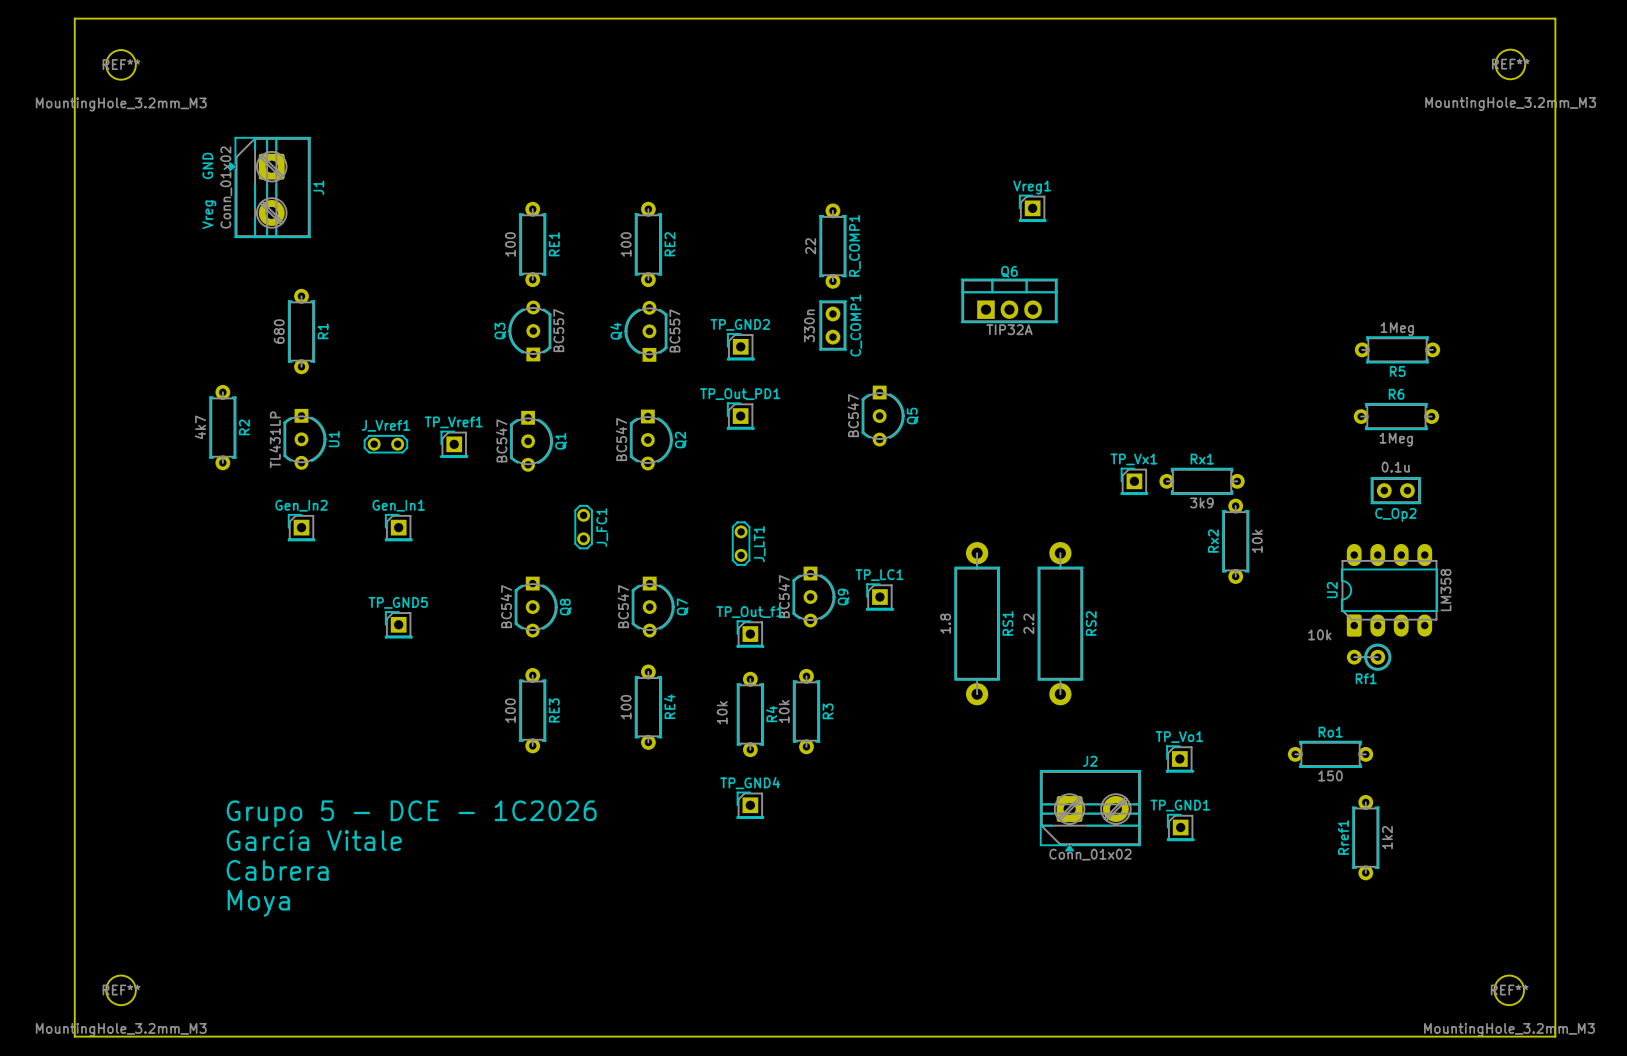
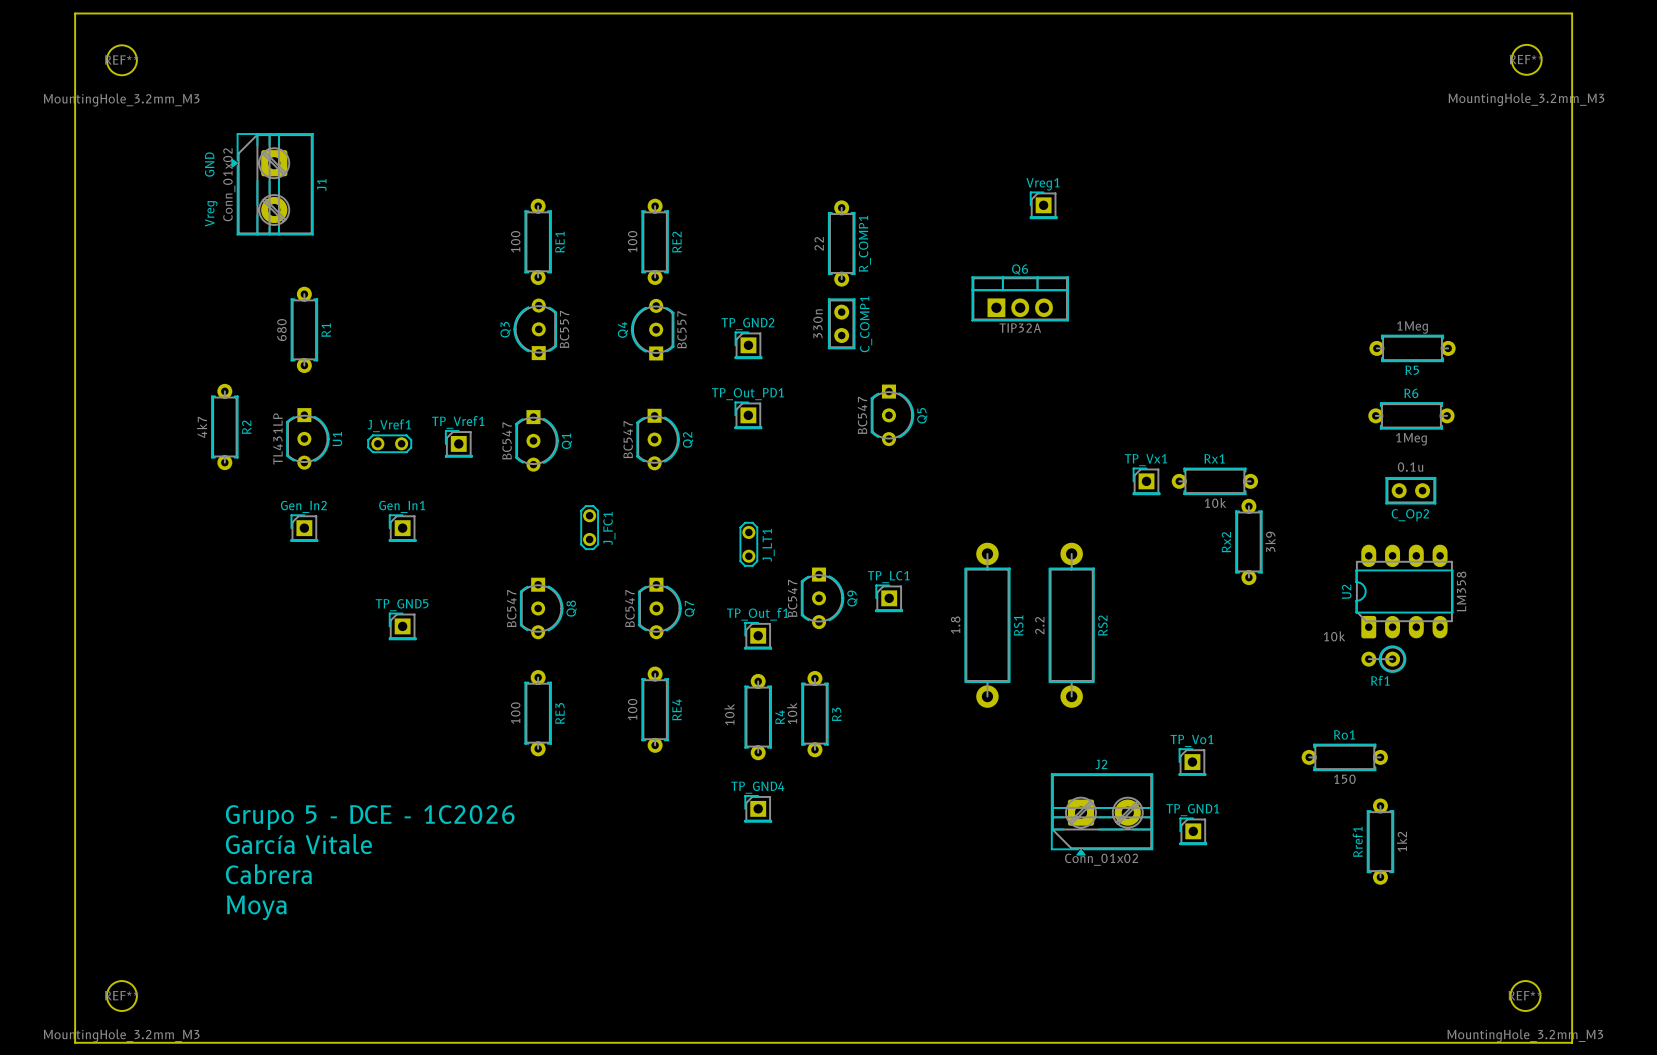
Rx1 value: 3k9 (1201, 502) -> 10k (1215, 502)
Rx2 value: 10k (1257, 541) -> 3k9 (1270, 541)

